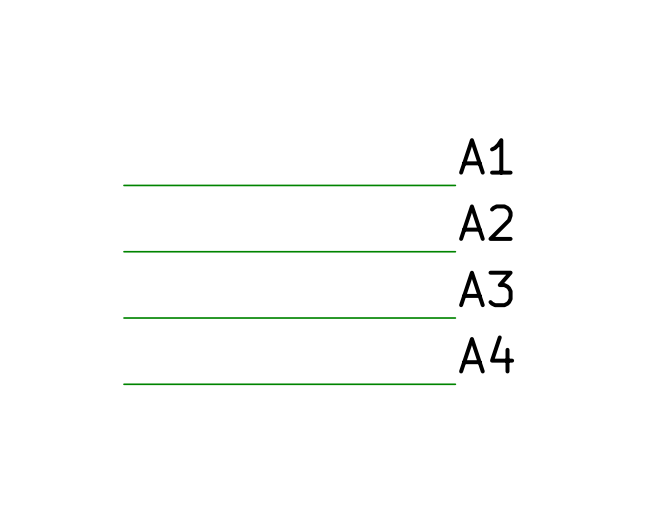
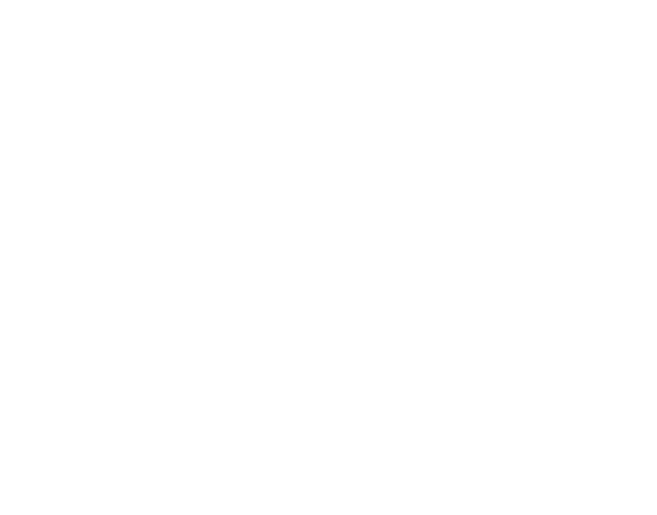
label: A1 (485, 156) -> none
wire: (123, 185) (455, 185) -> none
label: A2 (485, 222) -> none
wire: (123, 251) (455, 251) -> none
label: A3 (485, 288) -> none
wire: (123, 318) (455, 318) -> none
label: A4 (486, 354) -> none
wire: (123, 384) (455, 384) -> none

